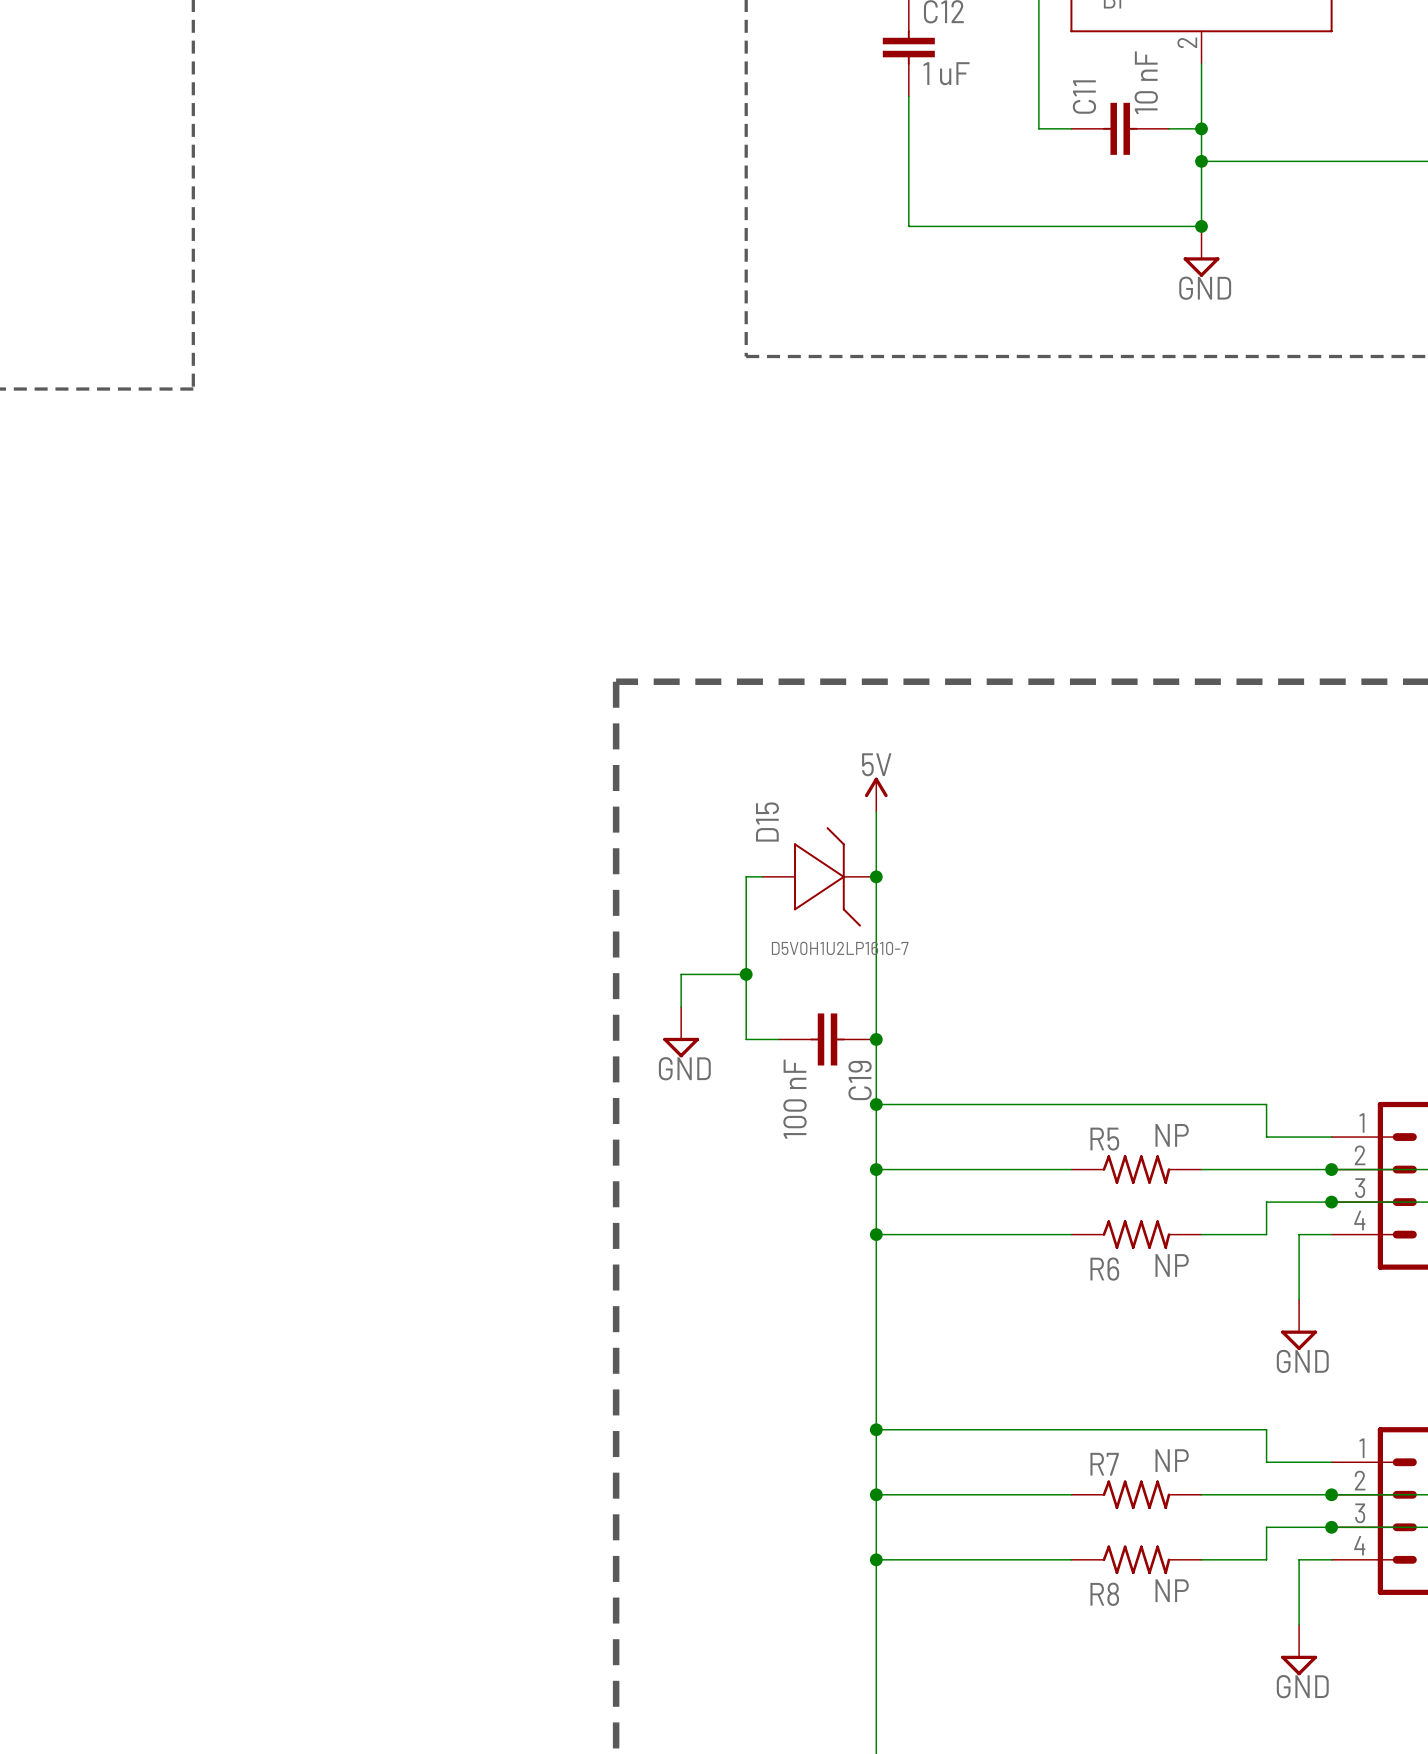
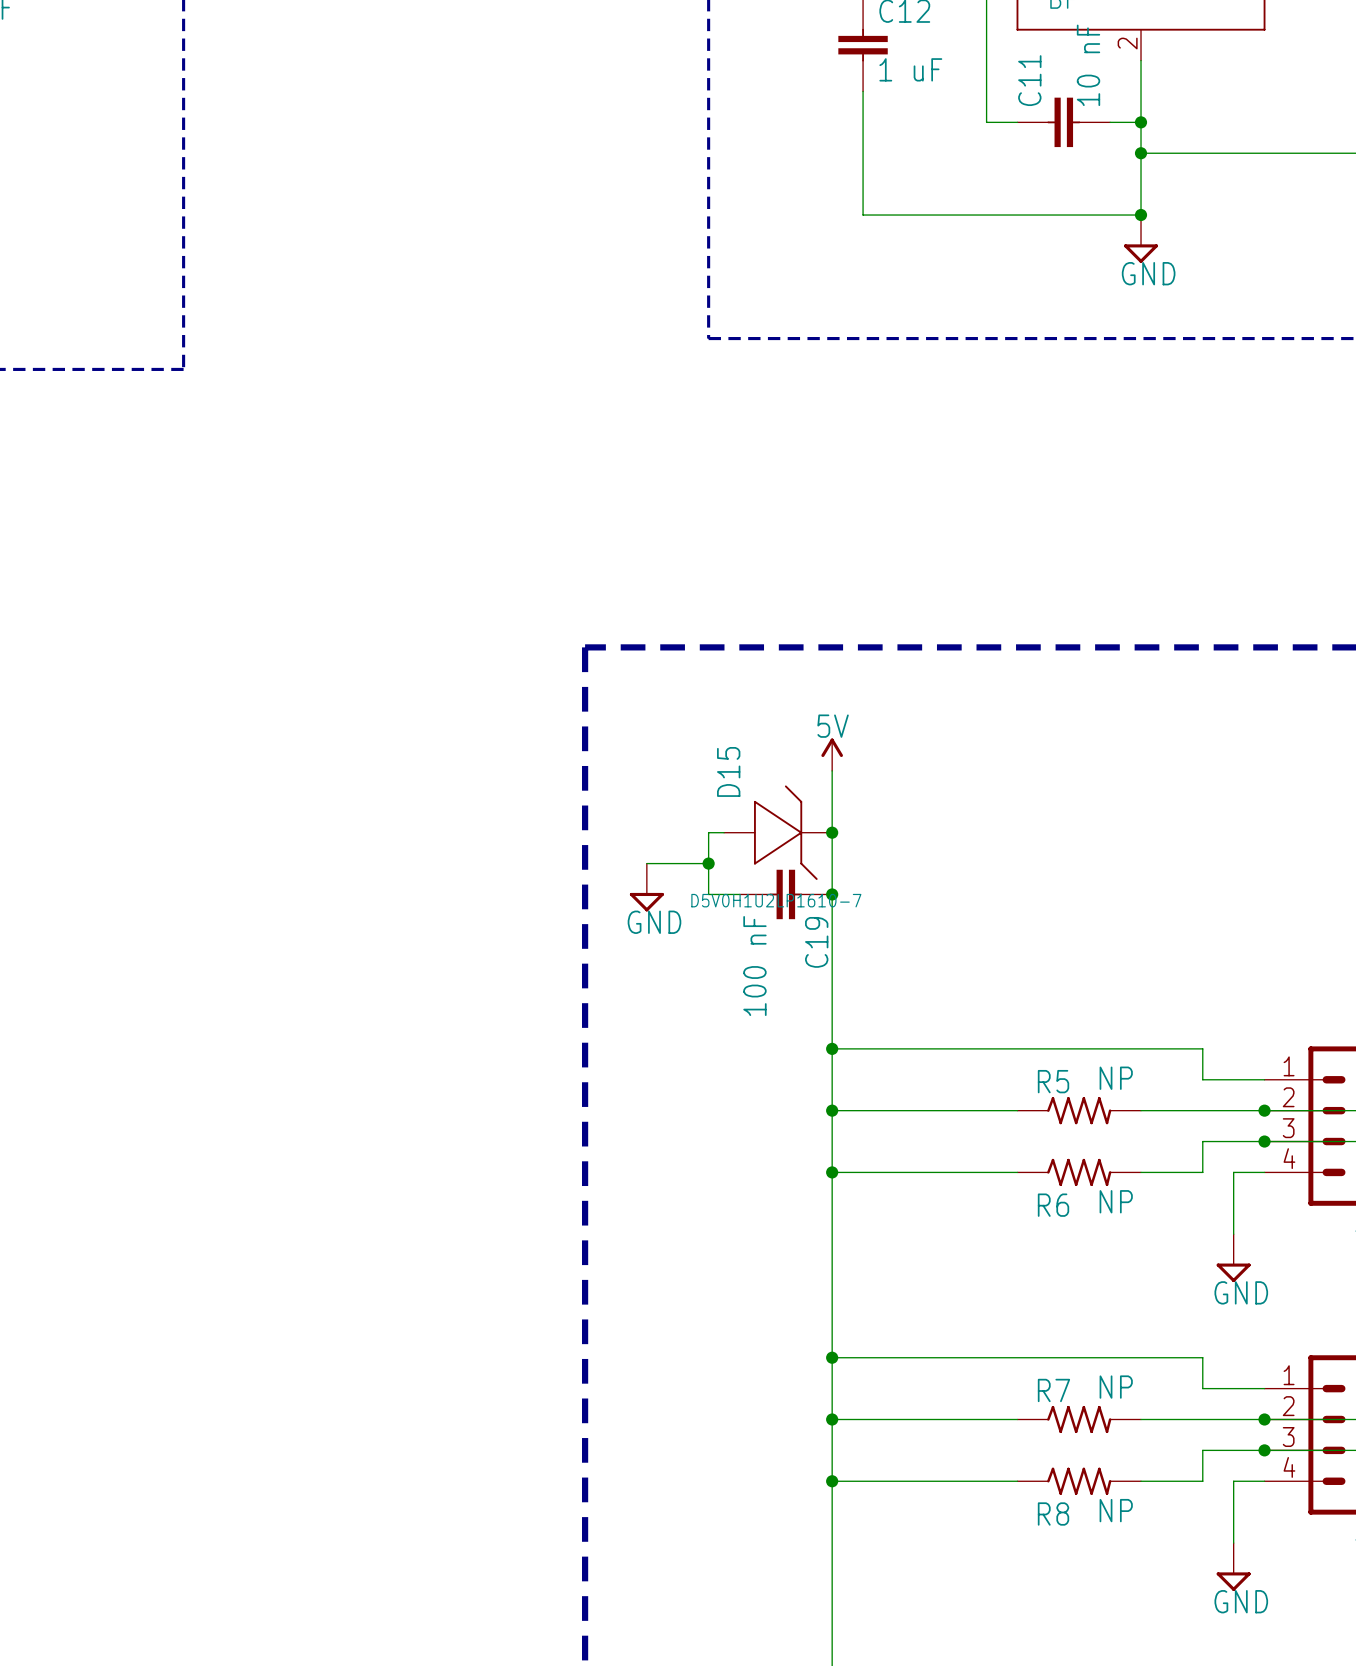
wire: none -> (646, 863) (708, 863)
wire: (746, 941) (746, 1039) (778, 1039) -> (708, 894) (739, 894)
junction: none -> (832, 894)
wire: (746, 974) (681, 974) (681, 1006) -> none
junction position: (746, 974) -> (708, 863)
power symbol position: GND (681, 1032) -> GND (646, 887)
C19 position: (827, 1039) -> (785, 894)
junction: (876, 1039) -> none

